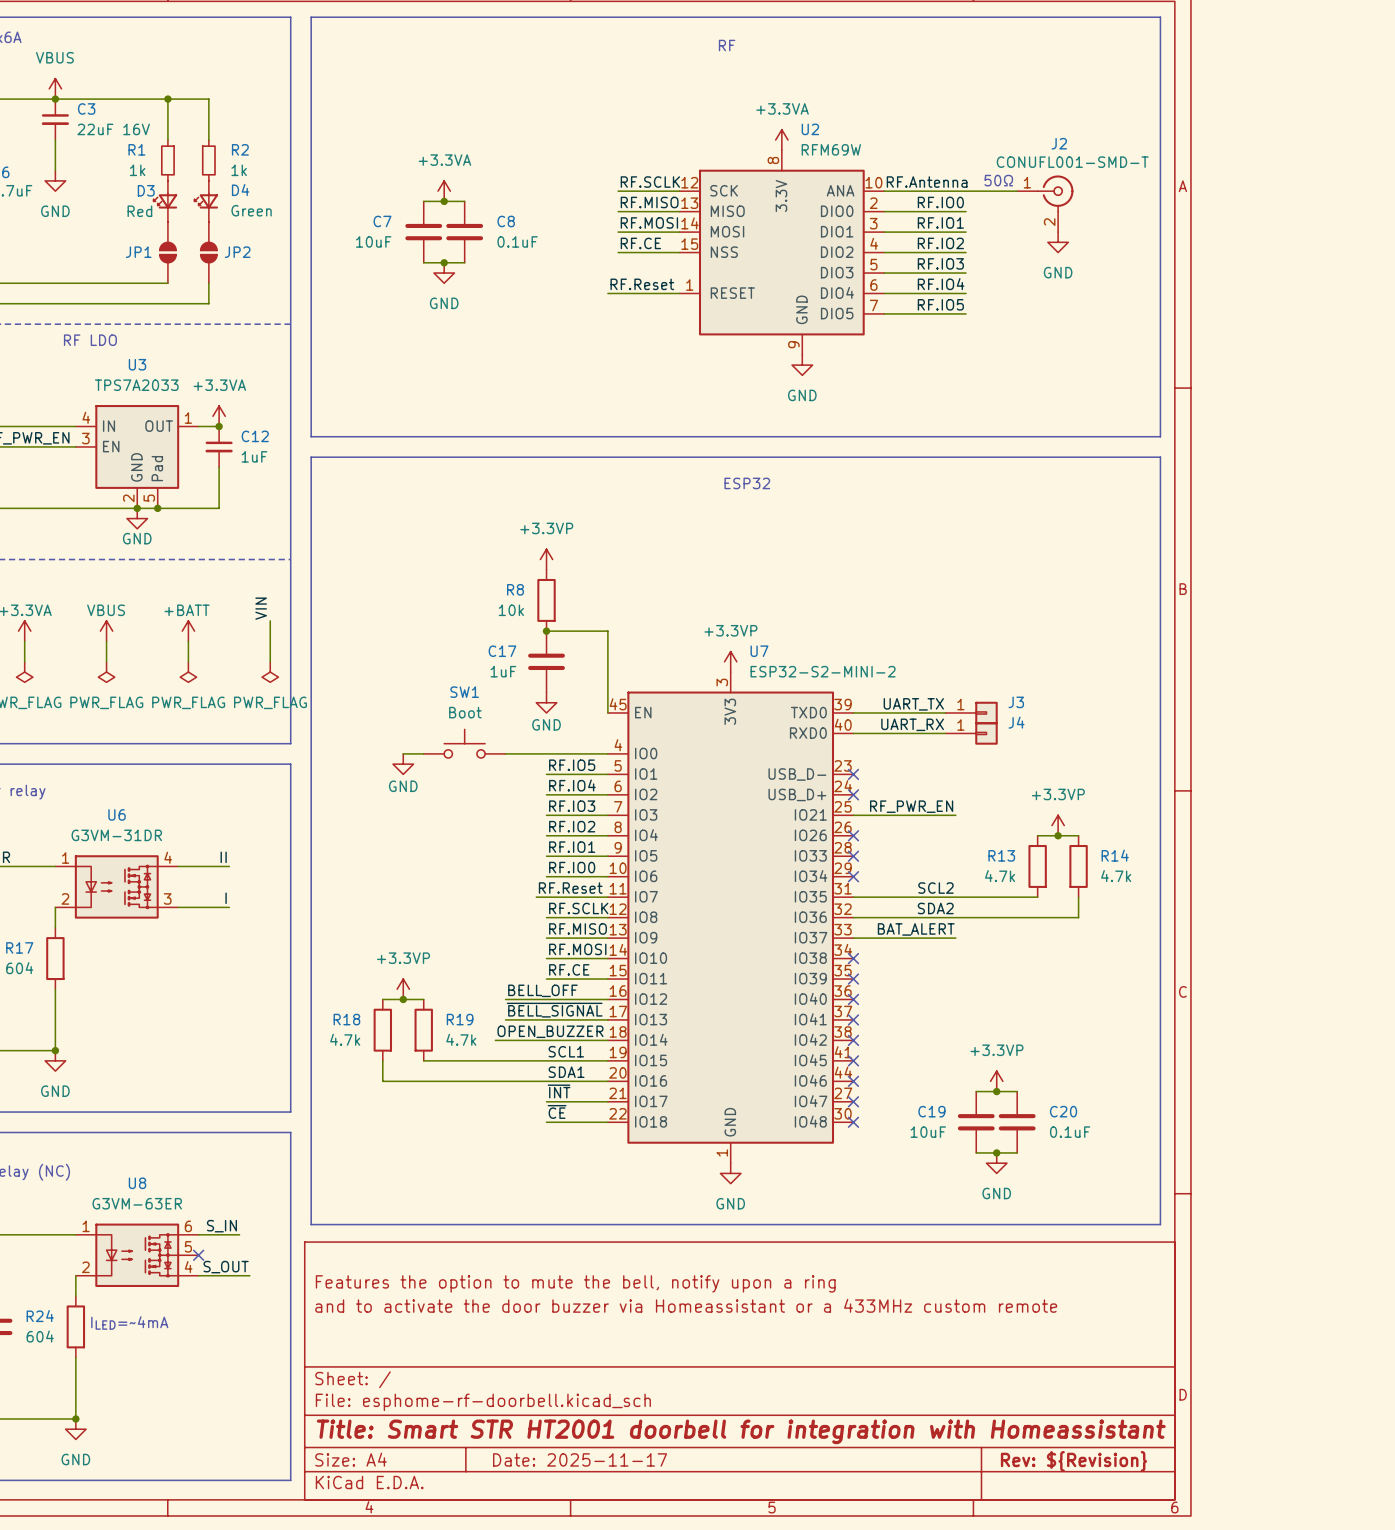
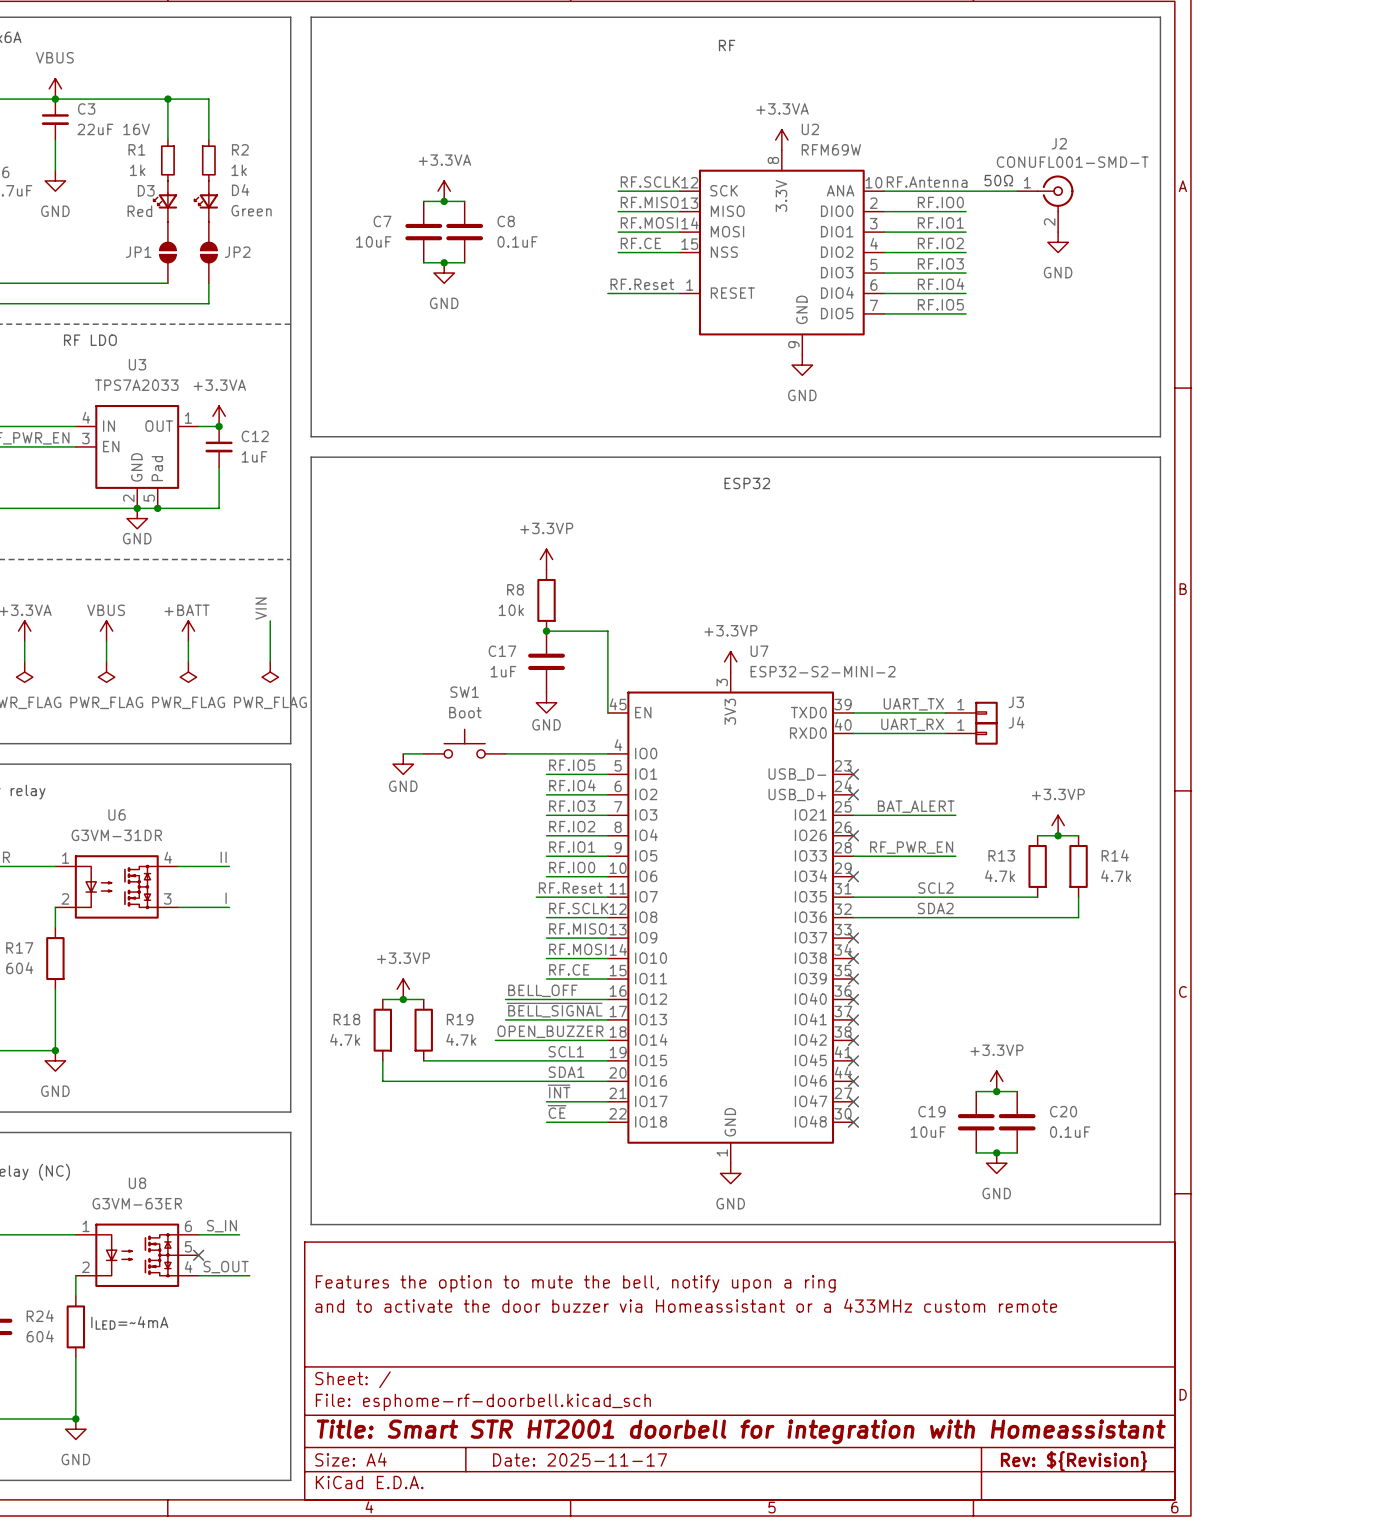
label: RF_PWR_EN (911, 806) -> BAT_ALERT (916, 806)
label: none -> RF_PWR_EN (911, 847)
no-connect mark: (853, 856) -> none
label: BAT_ALERT (916, 929) -> none
wire: (853, 938) (955, 938) -> (853, 856) (955, 856)
no-connect mark: none -> (853, 938)

